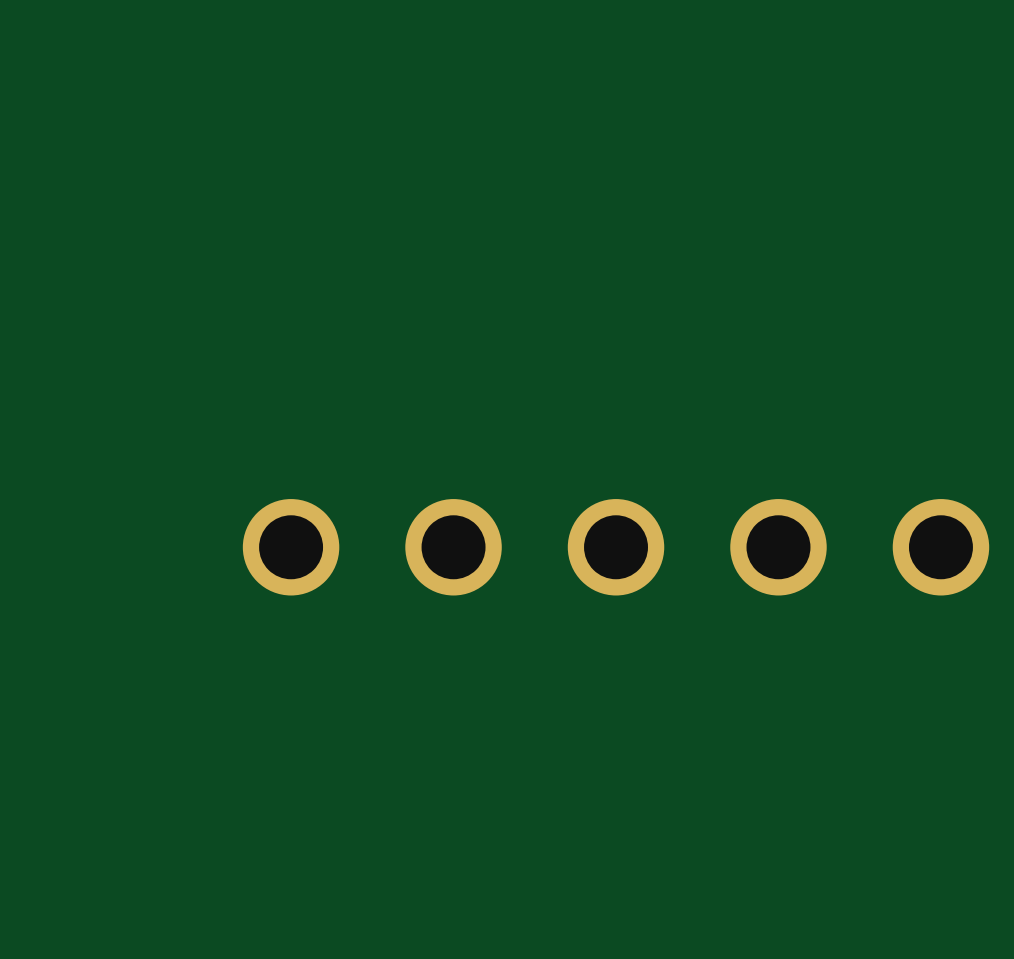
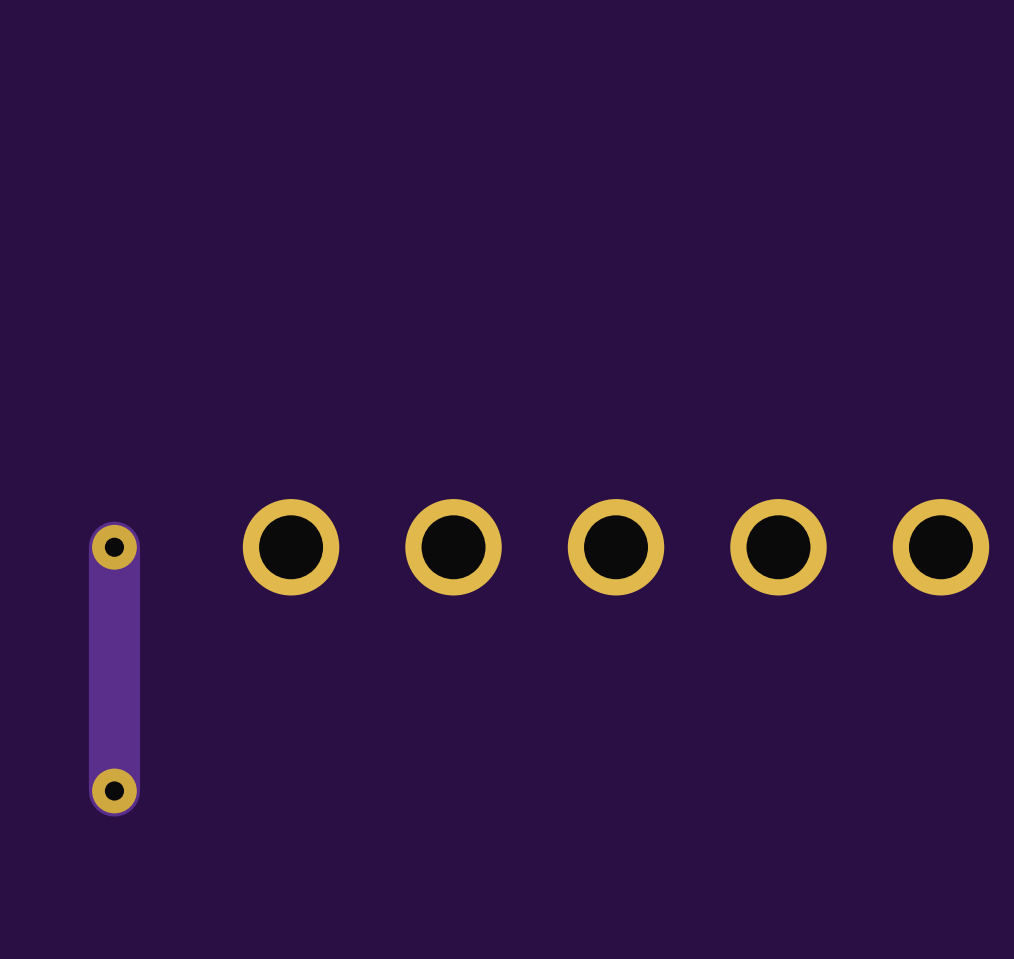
track: none -> (114, 547) (114, 790)
via: none -> (114, 547)
via: none -> (114, 790)

